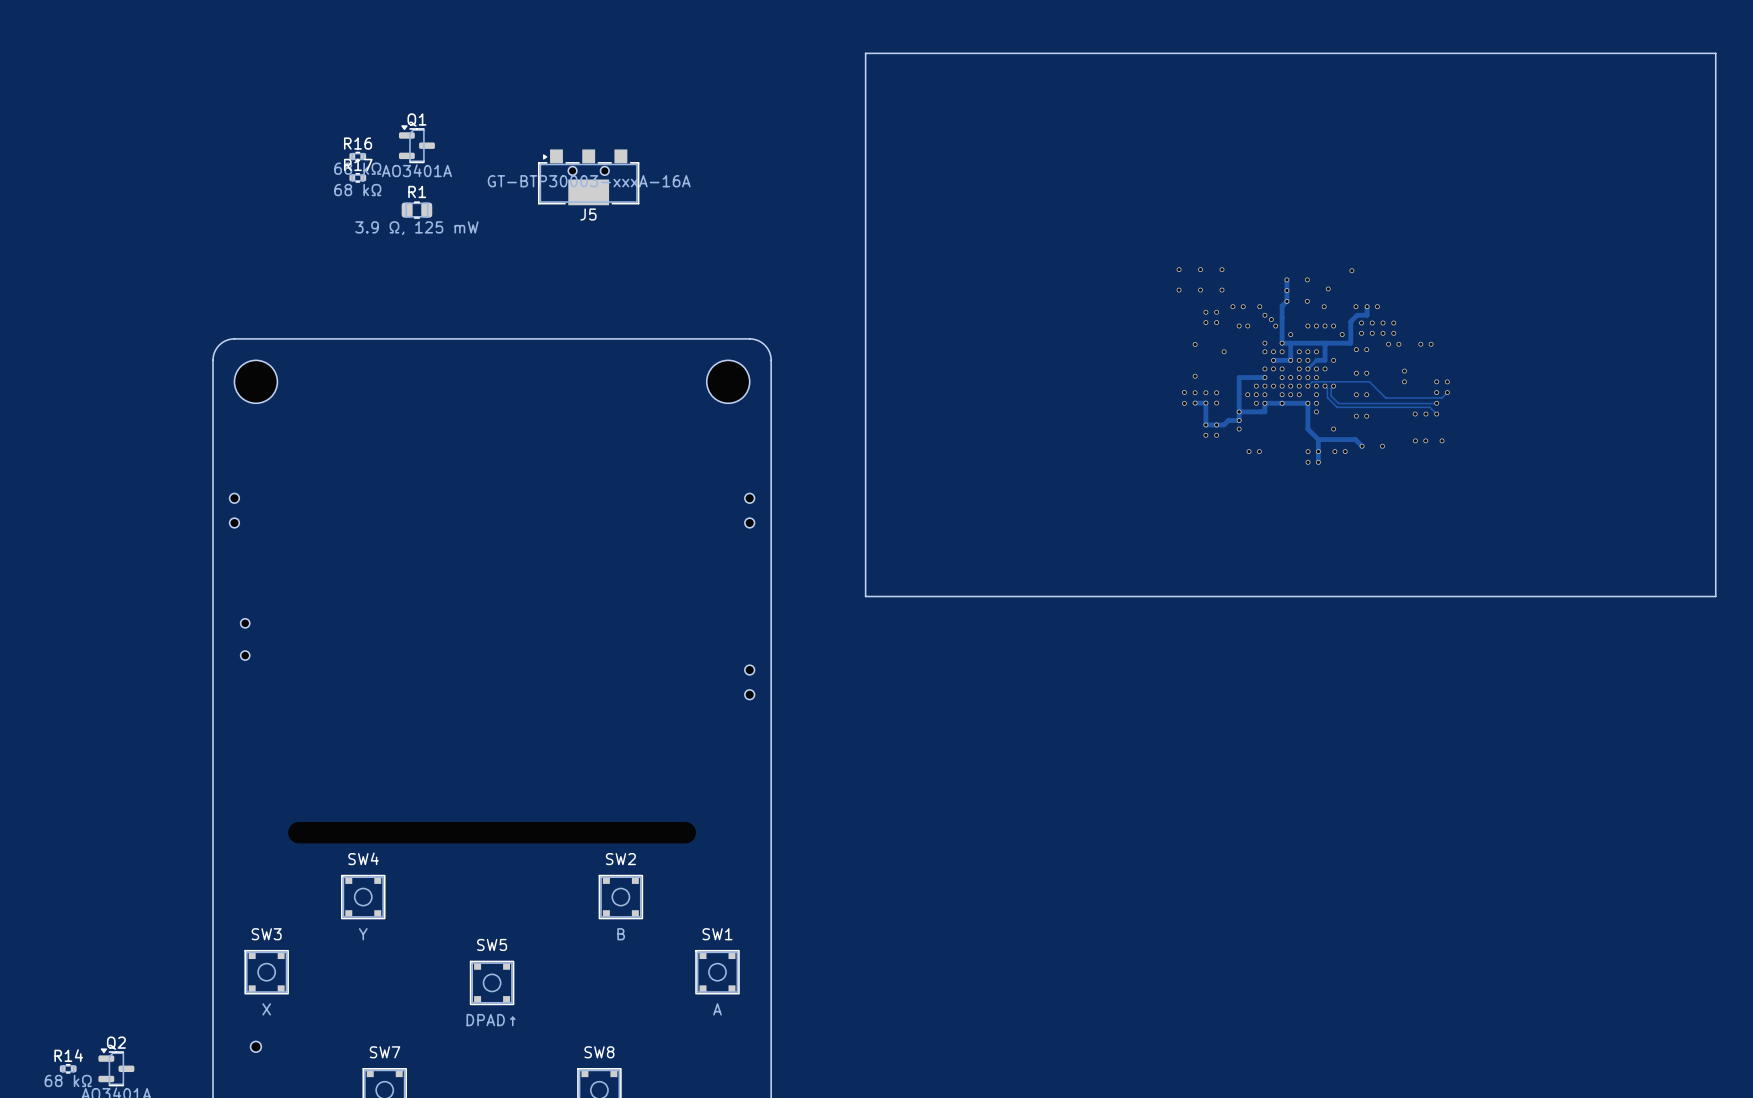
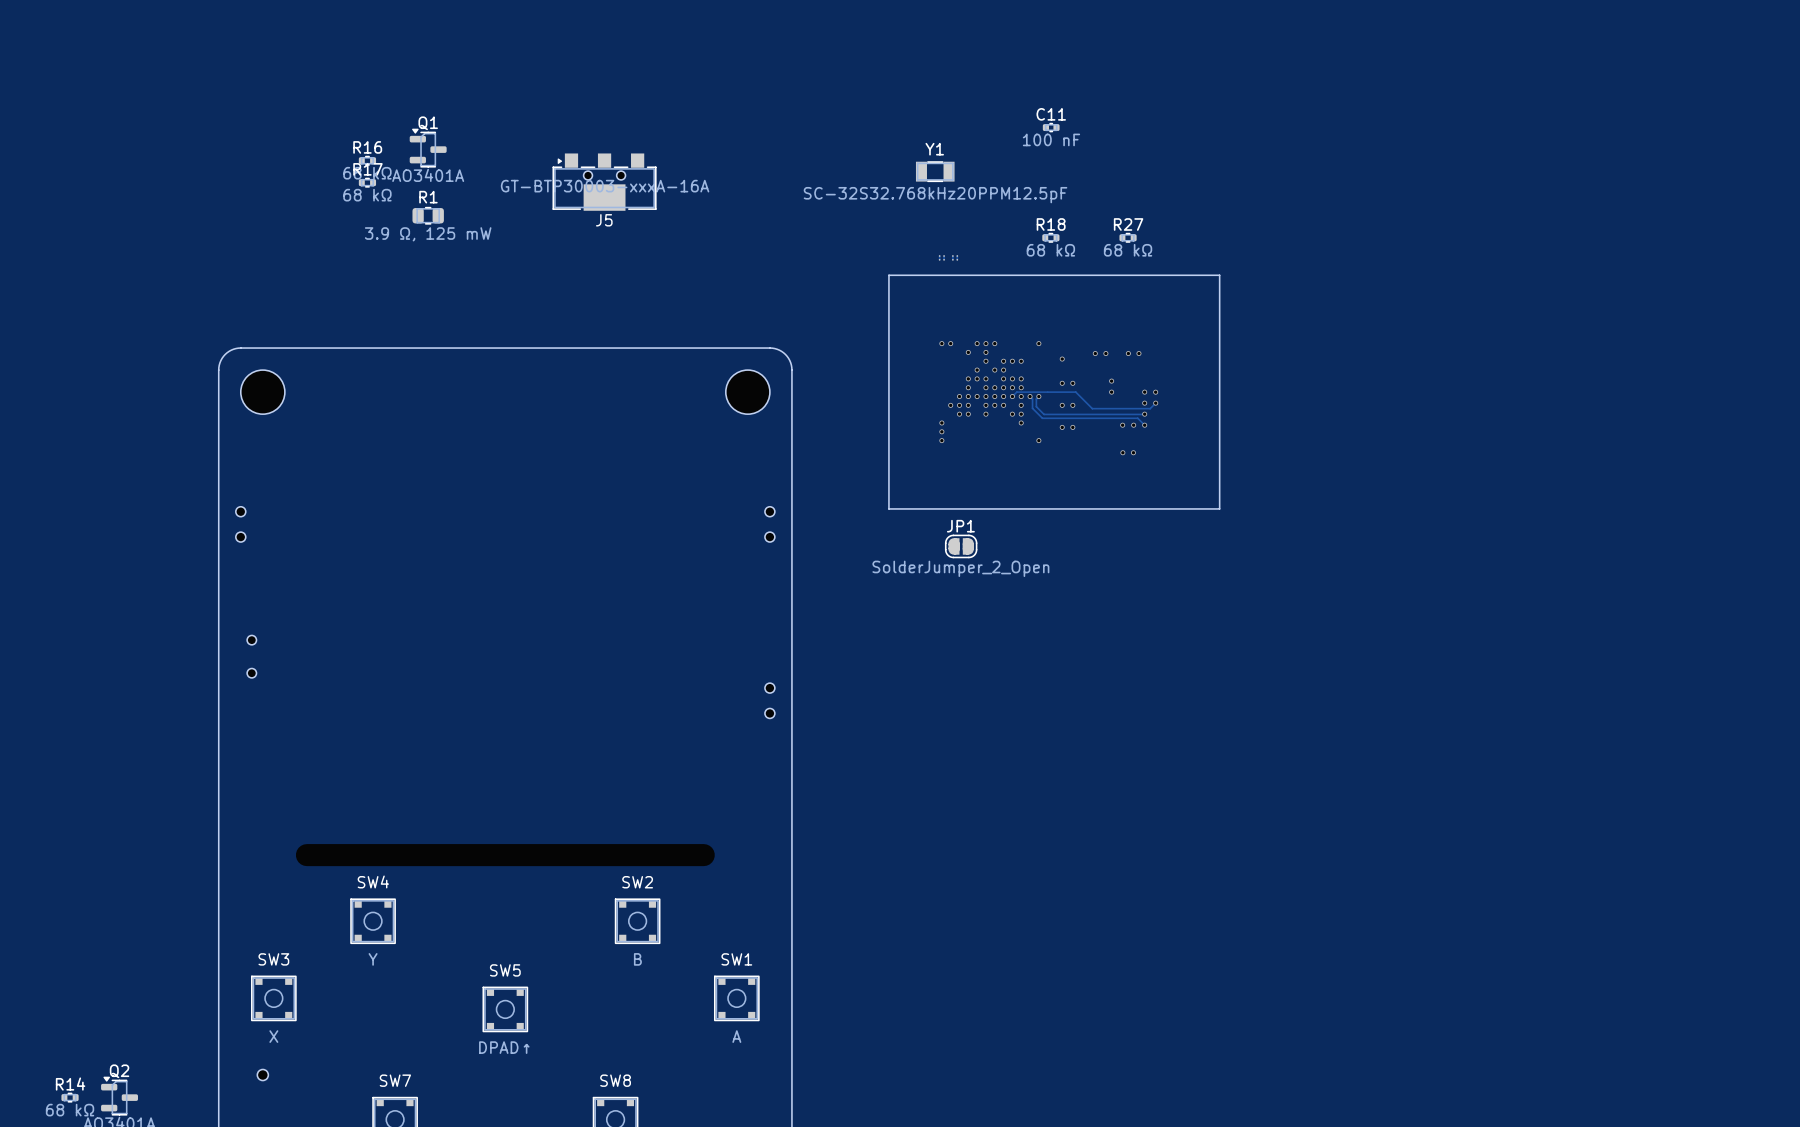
C11: none -> 100 nF (1051, 127)
Y1: none -> SC-32S32.768kHz20PPM12.5pF (935, 171)
R18: none -> 68 kΩ (1050, 237)
R27: none -> 68 kΩ (1128, 237)
part: none -> (939, 257)
part: none -> (944, 257)
part: none -> (952, 257)
part: none -> (957, 257)
board edge: (865, 268) (865, 53) (1715, 53) (1715, 596) (865, 596) (865, 495) -> (888, 275) (1219, 275) (1219, 508) (888, 508)
via: (1179, 269) -> none
via: (1200, 269) -> none
via: (1221, 269) -> none
via: (1351, 270) -> none
track: (1286, 279) (1286, 301) (1282, 306) (1282, 343) (1350, 343) (1350, 321) (1357, 315) (1367, 315) (1367, 306) -> none
via: (1286, 279) -> none
via: (1307, 279) -> none
via: (1328, 288) -> none
via: (1179, 290) -> none
via: (1200, 290) -> none
via: (1221, 290) -> none
via: (1286, 290) -> none
via: (1286, 301) -> none
via: (1307, 301) -> none
via: (1232, 306) -> none
via: (1243, 306) -> none
via: (1259, 306) -> none
via: (1324, 306) -> none
via: (1355, 306) -> none
via: (1367, 306) -> none
via: (1377, 306) -> none
via: (1205, 312) -> none
via: (1216, 312) -> none
via: (1264, 315) -> none
via: (1271, 319) -> none
via: (1205, 322) -> none
via: (1216, 322) -> none
via: (1361, 323) -> none
via: (1372, 323) -> none
via: (1383, 323) -> none
via: (1393, 323) -> none
via: (1239, 326) -> none
via: (1247, 326) -> none
via: (1275, 326) -> none
via: (1307, 326) -> none
via: (1316, 326) -> none
via: (1325, 326) -> none
via: (1333, 326) -> none
via: (1361, 333) -> none
via: (1372, 333) -> none
via: (1383, 333) -> none
via: (1393, 333) -> none
via: none -> (941, 343)
via: none -> (950, 343)
via: none -> (977, 343)
via: none -> (985, 343)
via: none -> (994, 343)
via: none -> (1038, 343)
via: (1290, 334) -> none
via: (1342, 334) -> none
via: none -> (968, 352)
via: none -> (985, 352)
via: (1264, 343) -> none
via: (1282, 343) -> none
track: (1290, 343) (1290, 360) (1273, 360) -> none
track: (1325, 343) (1325, 360) (1316, 360) (1307, 368) -> none
via: none -> (1095, 353)
via: none -> (1105, 353)
via: none -> (1128, 353)
via: none -> (1138, 353)
via: (1195, 344) -> none
via: (1388, 344) -> none
via: (1398, 344) -> none
via: (1420, 344) -> none
via: (1431, 344) -> none
via: none -> (1062, 359)
via: (1356, 349) -> none
via: (1366, 349) -> none
via: none -> (985, 361)
via: none -> (1003, 361)
via: none -> (1012, 361)
via: none -> (1021, 361)
via: (1224, 351) -> none
via: (1264, 351) -> none
via: (1273, 351) -> none
via: (1282, 351) -> none
via: (1299, 351) -> none
via: (1307, 351) -> none
via: (1316, 351) -> none
via: none -> (977, 370)
via: none -> (994, 370)
via: none -> (1003, 370)
via: (1273, 360) -> none
via: (1290, 360) -> none
via: (1299, 360) -> none
via: (1307, 360) -> none
via: (1333, 360) -> none
via: none -> (968, 378)
via: none -> (977, 378)
via: none -> (985, 378)
via: none -> (1003, 378)
via: none -> (1012, 378)
via: none -> (1021, 378)
via: (1264, 368) -> none
via: (1273, 368) -> none
via: (1282, 368) -> none
via: (1299, 368) -> none
via: (1307, 368) -> none
via: (1316, 368) -> none
via: (1325, 368) -> none
via: none -> (1111, 381)
via: (1404, 371) -> none
via: none -> (1062, 383)
via: none -> (1072, 383)
via: (1356, 373) -> none
via: (1366, 373) -> none
via: (1195, 376) -> none
via: none -> (968, 387)
via: none -> (985, 387)
via: none -> (994, 387)
via: none -> (1003, 387)
via: none -> (1012, 387)
via: none -> (1021, 387)
track: (1264, 377) (1239, 377) (1239, 420) (1228, 420) (1223, 424) (1205, 424) (1205, 403) (1195, 403) -> none
via: (1264, 377) -> none
via: (1282, 377) -> none
via: (1290, 377) -> none
via: (1299, 377) -> none
via: (1307, 377) -> none
via: (1316, 377) -> none
via: none -> (1111, 392)
via: none -> (1144, 392)
via: none -> (1155, 392)
via: (1404, 381) -> none
via: (1436, 381) -> none
via: (1447, 381) -> none
via: none -> (959, 396)
via: none -> (968, 396)
via: none -> (977, 396)
via: none -> (985, 396)
via: none -> (994, 396)
via: none -> (1003, 396)
track: none -> (1012, 396) (1016, 392) (1075, 392) (1092, 408) (1150, 408) (1155, 403)
via: none -> (1012, 396)
via: none -> (1021, 396)
track: none -> (1030, 396) (1032, 399) (1032, 408) (1042, 418) (1137, 418) (1144, 425)
via: none -> (1030, 396)
track: none -> (1038, 396) (1036, 399) (1036, 406) (1044, 414) (1144, 414)
via: none -> (1038, 396)
via: (1256, 386) -> none
via: (1264, 386) -> none
via: (1273, 386) -> none
via: (1282, 386) -> none
via: (1290, 386) -> none
via: (1299, 386) -> none
track: (1307, 386) (1312, 381) (1369, 381) (1385, 397) (1442, 397) (1447, 392) -> none
via: (1307, 386) -> none
via: (1316, 386) -> none
track: (1325, 386) (1327, 388) (1327, 397) (1337, 407) (1429, 407) (1436, 414) -> none
via: (1325, 386) -> none
track: (1333, 386) (1331, 388) (1331, 396) (1338, 403) (1436, 403) -> none
via: (1333, 386) -> none
via: none -> (1144, 403)
via: none -> (1155, 403)
via: (1184, 392) -> none
via: (1195, 392) -> none
via: (1205, 392) -> none
via: (1216, 392) -> none
via: (1436, 392) -> none
via: (1447, 392) -> none
via: none -> (950, 405)
via: none -> (959, 405)
via: none -> (968, 405)
via: none -> (985, 405)
via: none -> (994, 405)
via: none -> (1003, 405)
via: none -> (1021, 405)
via: none -> (1062, 405)
via: none -> (1072, 405)
via: (1247, 394) -> none
via: (1256, 394) -> none
via: (1264, 394) -> none
via: (1282, 394) -> none
via: (1290, 394) -> none
via: (1299, 394) -> none
via: (1316, 394) -> none
via: (1356, 394) -> none
via: (1366, 394) -> none
via: none -> (959, 414)
via: none -> (968, 414)
via: none -> (985, 414)
via: none -> (1012, 414)
via: none -> (1021, 414)
via: none -> (1144, 414)
via: (1184, 403) -> none
via: (1195, 403) -> none
via: (1205, 403) -> none
via: (1216, 403) -> none
via: (1256, 403) -> none
via: (1264, 403) -> none
via: (1282, 403) -> none
via: (1307, 403) -> none
via: (1316, 403) -> none
via: (1436, 403) -> none
via: none -> (941, 422)
via: none -> (1021, 422)
track: (1239, 411) (1264, 411) (1264, 403) (1307, 403) (1307, 429) (1318, 439) -> none
via: (1239, 411) -> none
via: (1316, 411) -> none
via: none -> (1122, 425)
via: none -> (1133, 425)
via: none -> (1144, 425)
via: (1415, 414) -> none
via: (1425, 414) -> none
via: (1436, 414) -> none
via: none -> (1062, 427)
via: none -> (1072, 427)
via: (1356, 416) -> none
via: (1366, 416) -> none
via: none -> (941, 431)
via: (1239, 420) -> none
via: (1205, 424) -> none
via: (1216, 424) -> none
via: none -> (941, 440)
via: none -> (1038, 440)
via: (1239, 429) -> none
via: (1333, 429) -> none
via: (1205, 435) -> none
via: (1216, 435) -> none
track: (1318, 439) (1355, 439) (1362, 446) -> none
track: (1318, 439) (1318, 462) -> none
via: none -> (1122, 452)
via: none -> (1133, 452)
via: (1415, 440) -> none
via: (1425, 440) -> none
via: (1442, 440) -> none
via: (1362, 446) -> none
via: (1382, 446) -> none
via: (1249, 451) -> none
via: (1259, 451) -> none
via: (1308, 451) -> none
via: (1318, 451) -> none
via: (1334, 451) -> none
via: (1345, 451) -> none
via: (1308, 462) -> none
via: (1318, 462) -> none
JP1: none -> SolderJumper_2_Open (961, 546)

